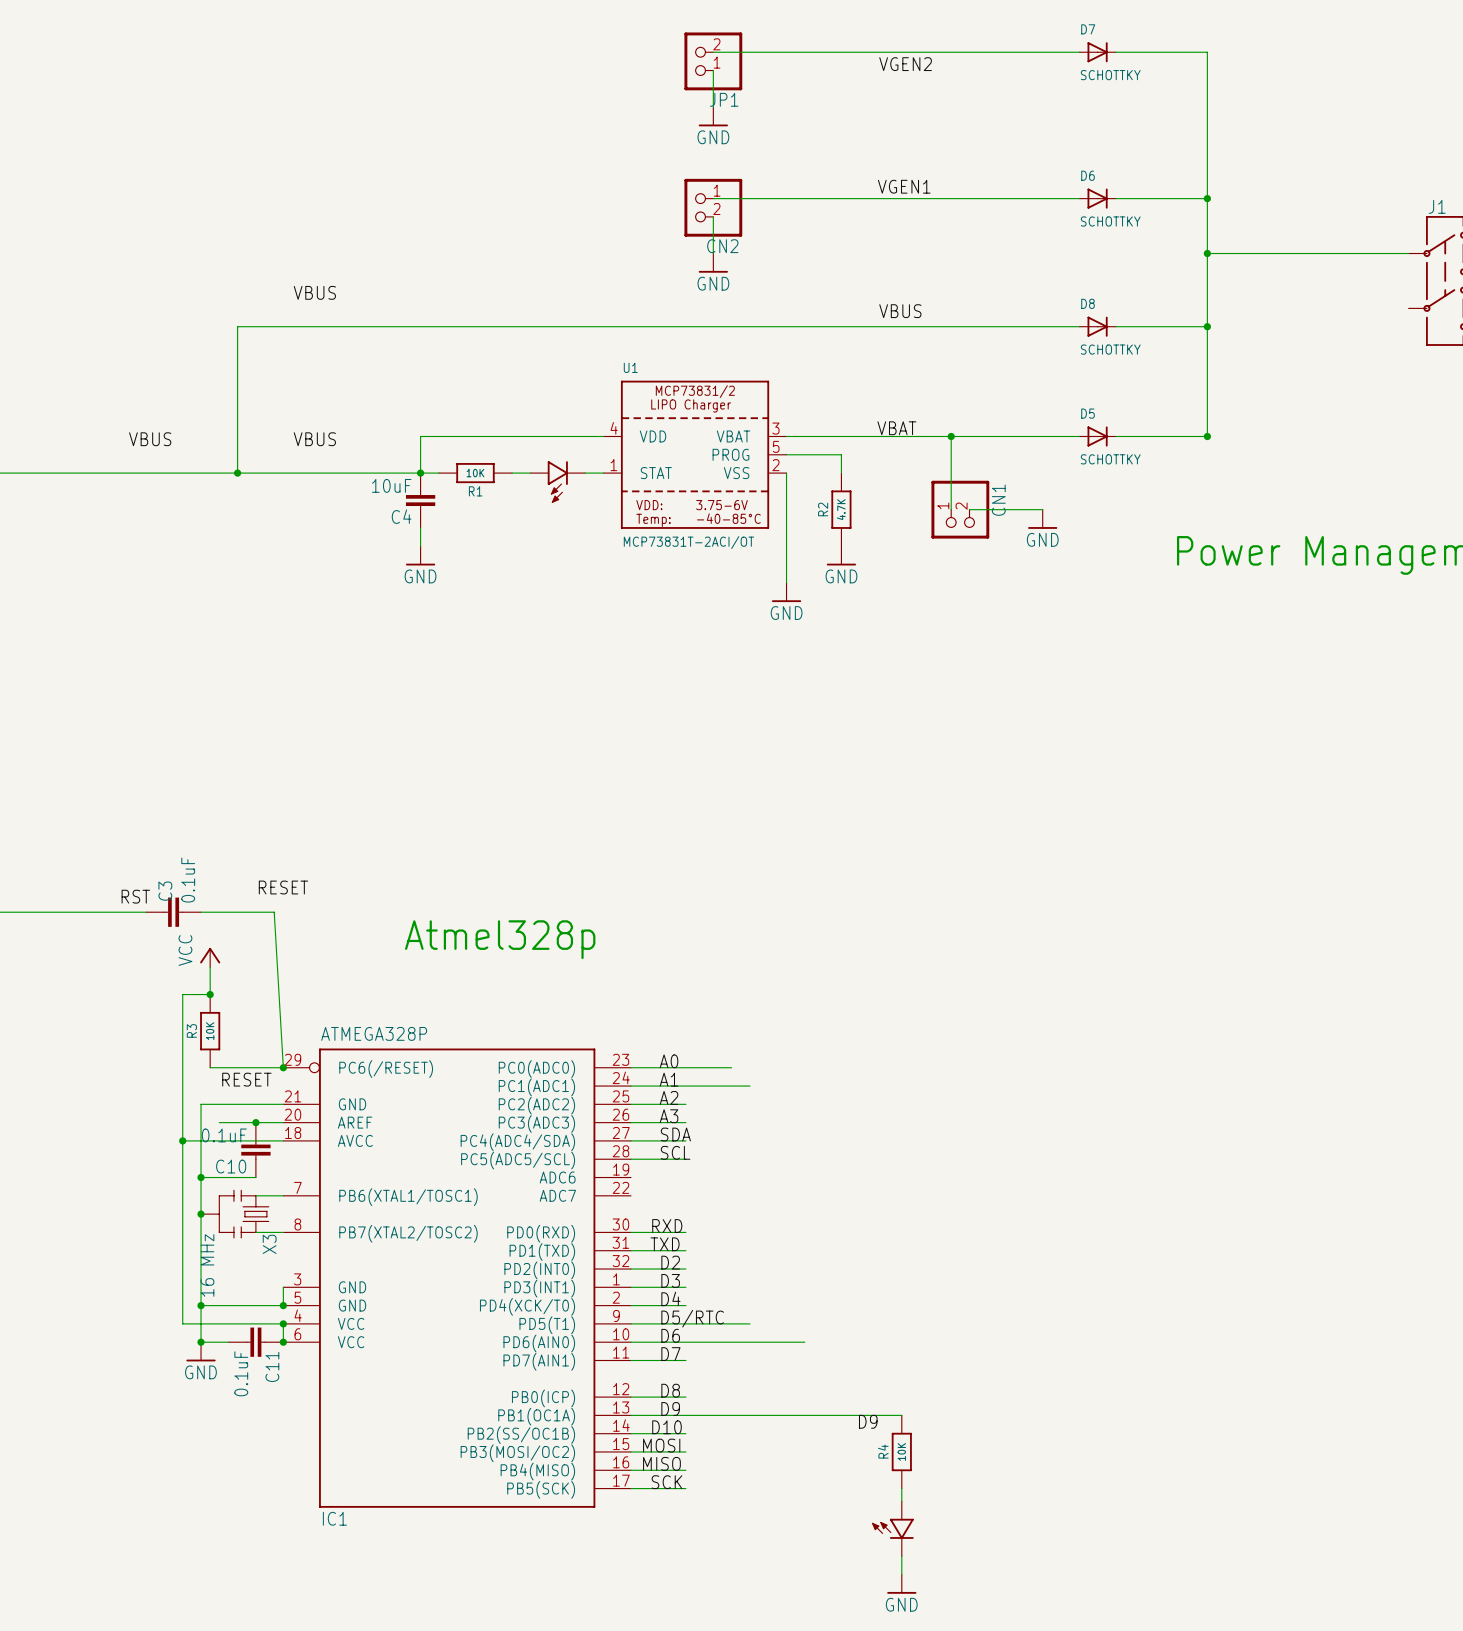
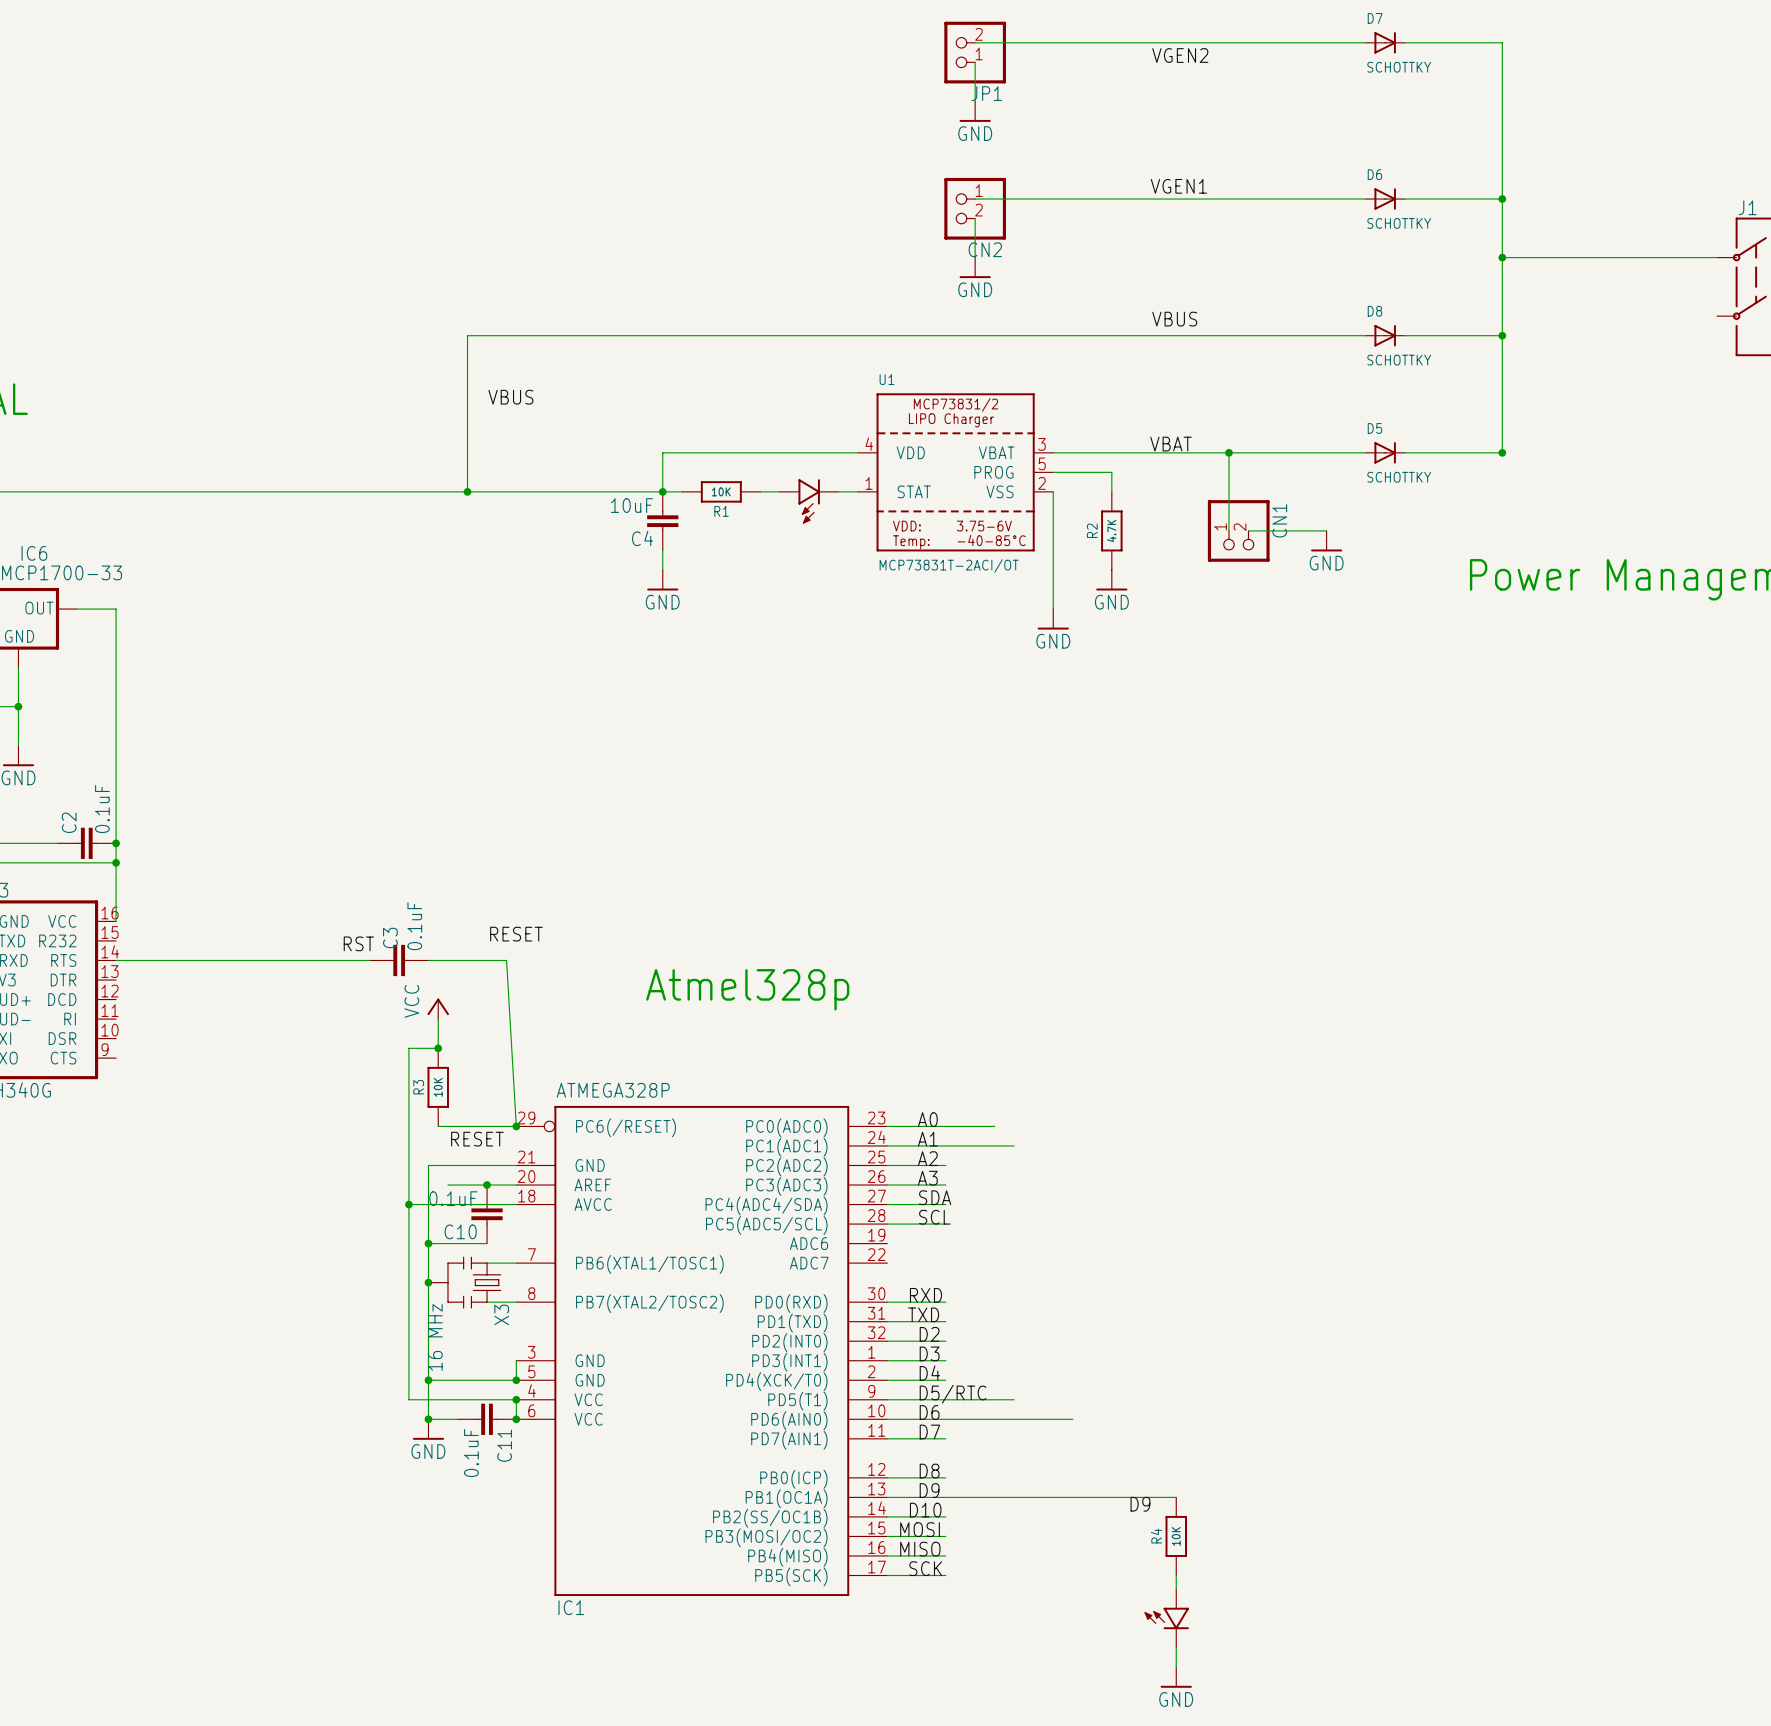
label: VBUS (314, 292) -> none
label: none -> VBUS (510, 397)
label: VBUS (150, 439) -> none
label: VBUS (314, 439) -> none

